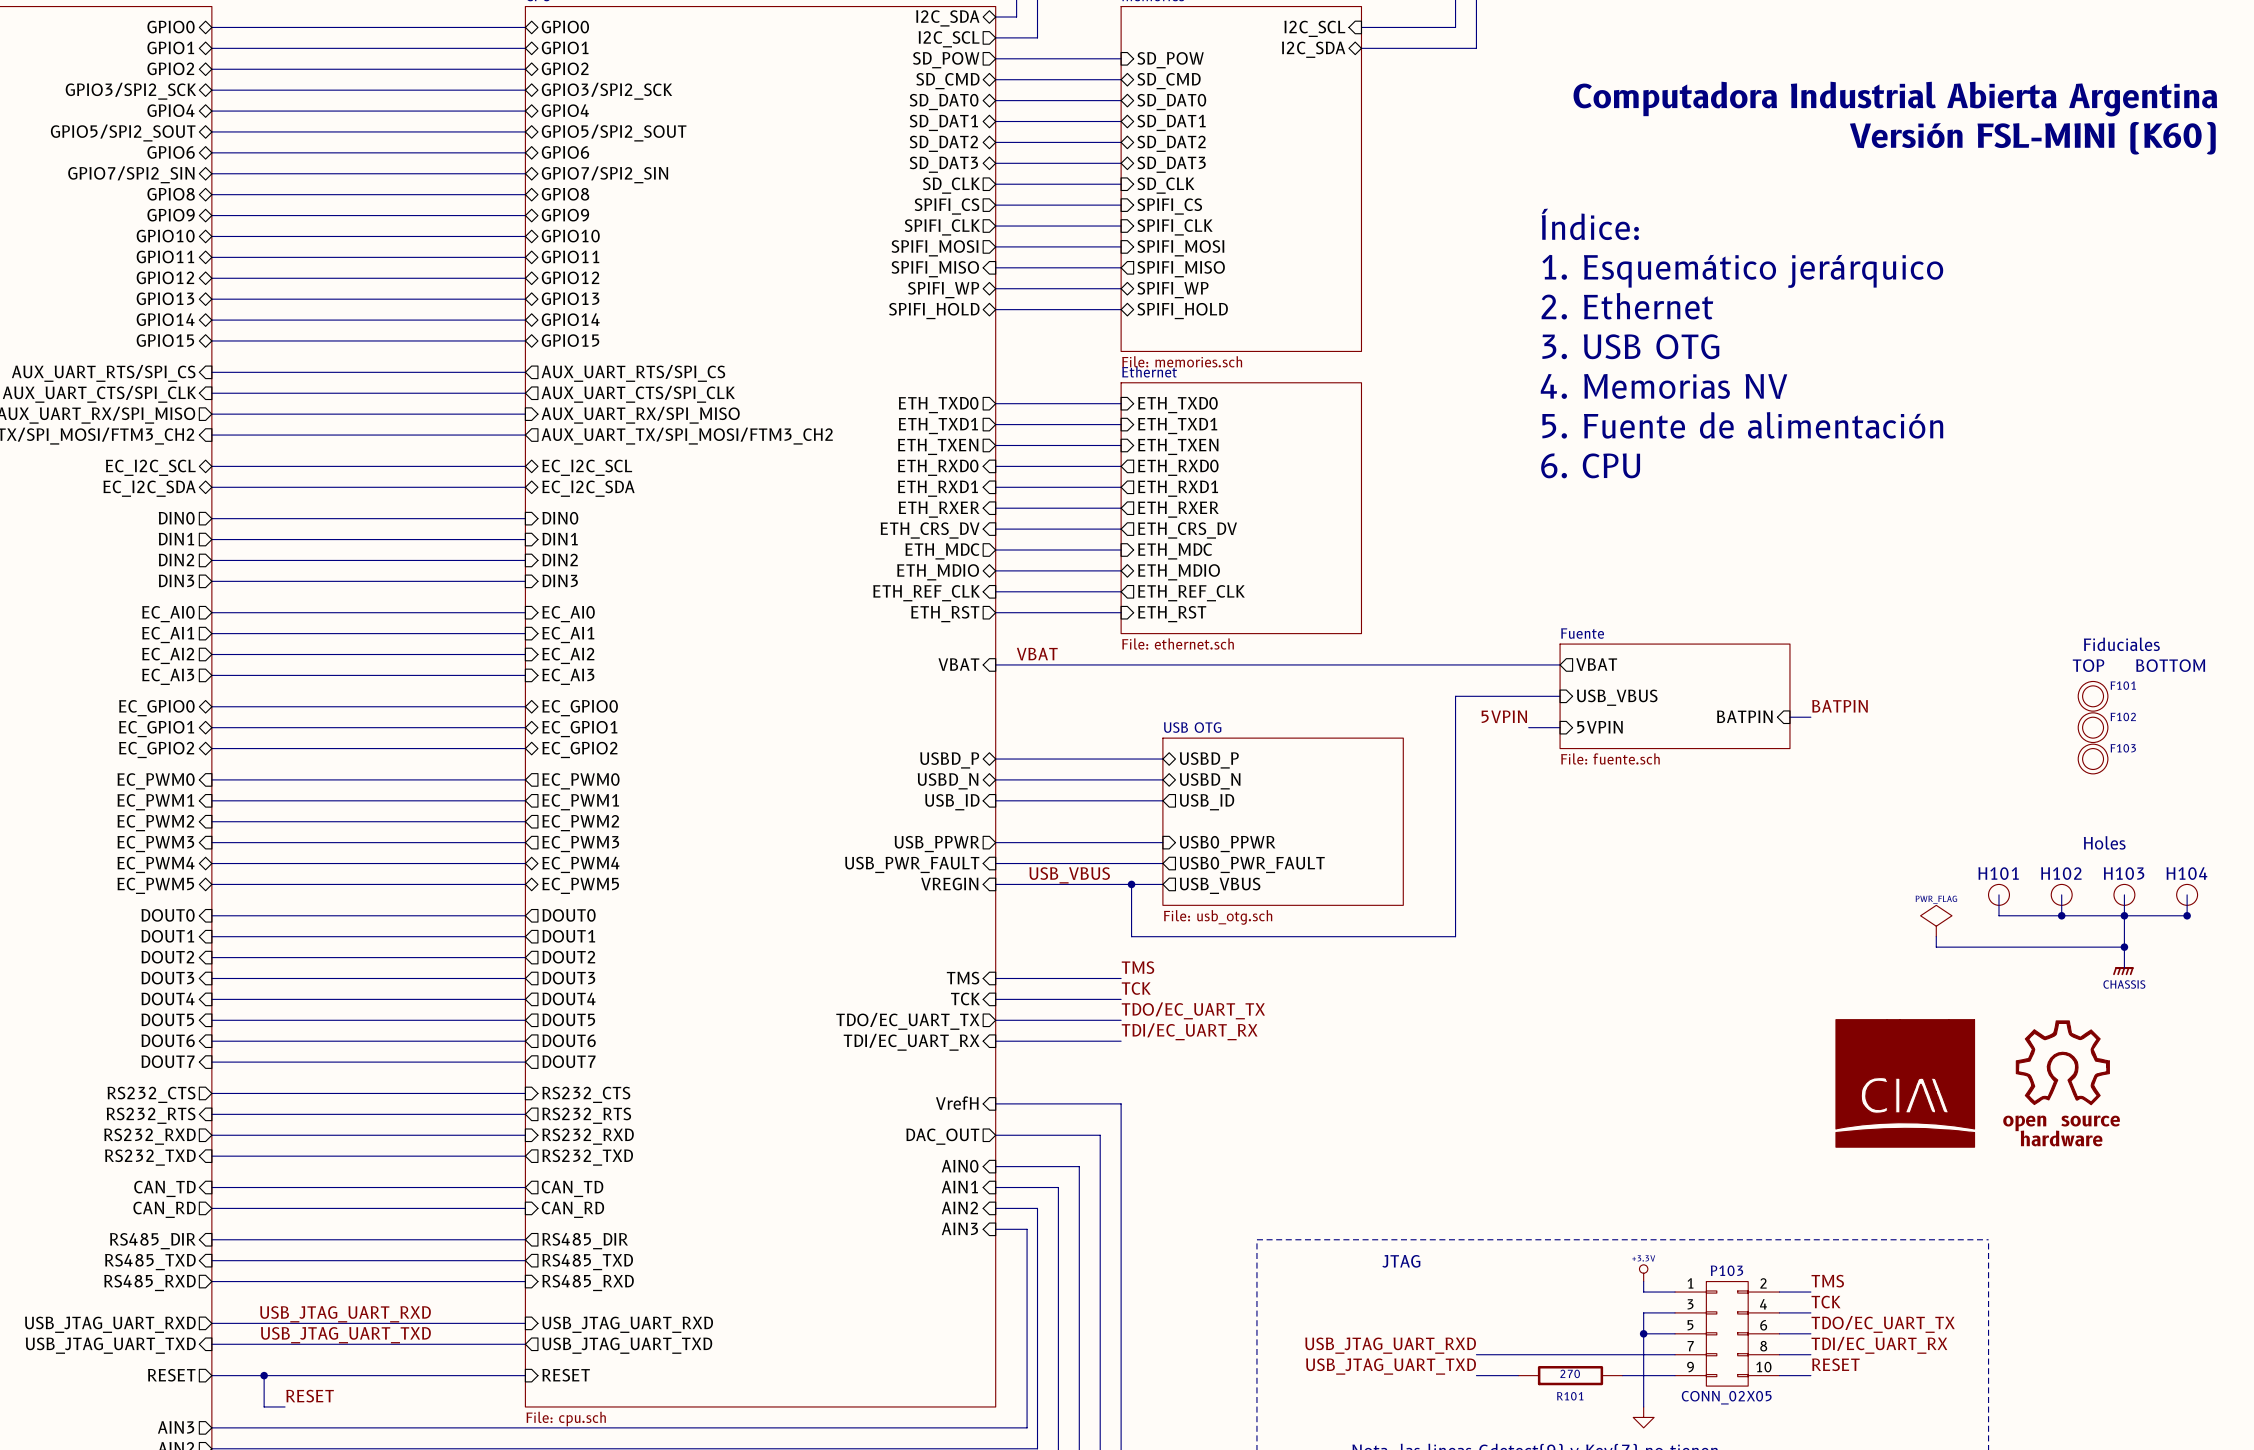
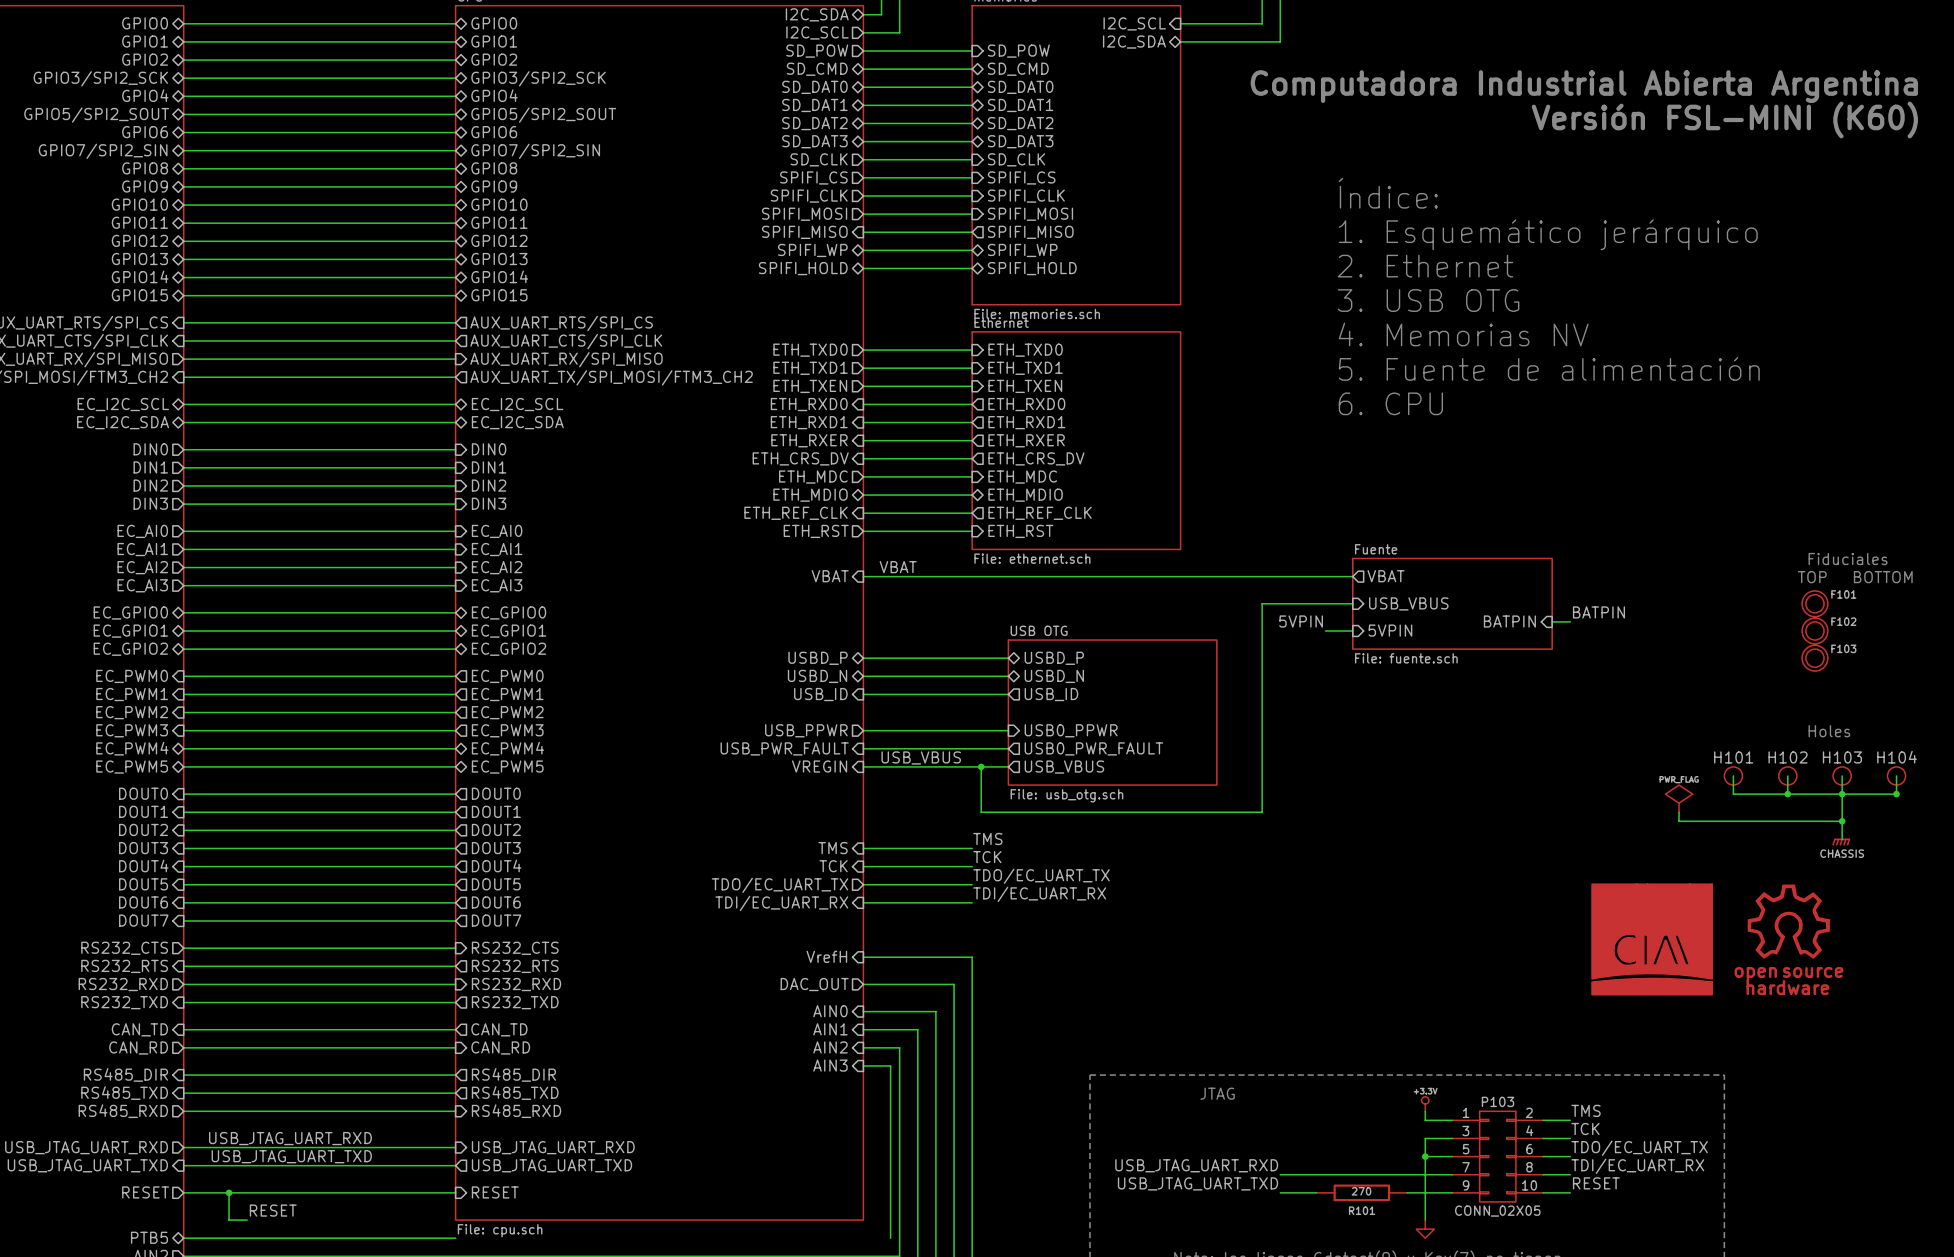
sheet pin shape: output (176, 1427) -> bidirectional (149, 1237)
sheet pin: AIN3 (176, 1427) -> PTB5 (149, 1237)
wire: (525, 1427) (1027, 1427) -> none

